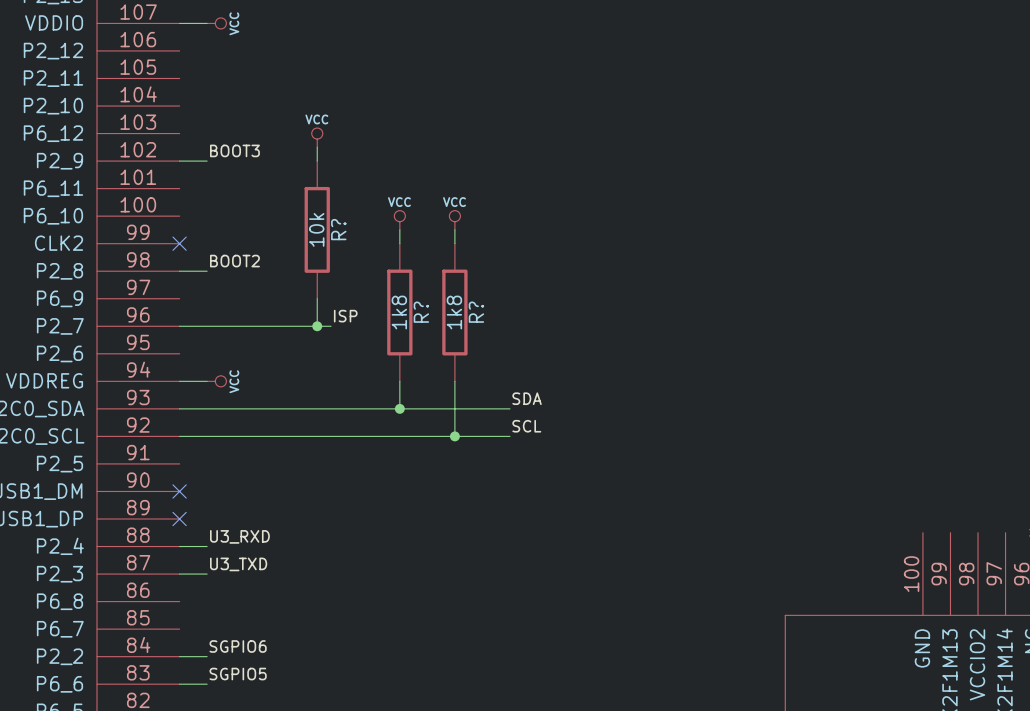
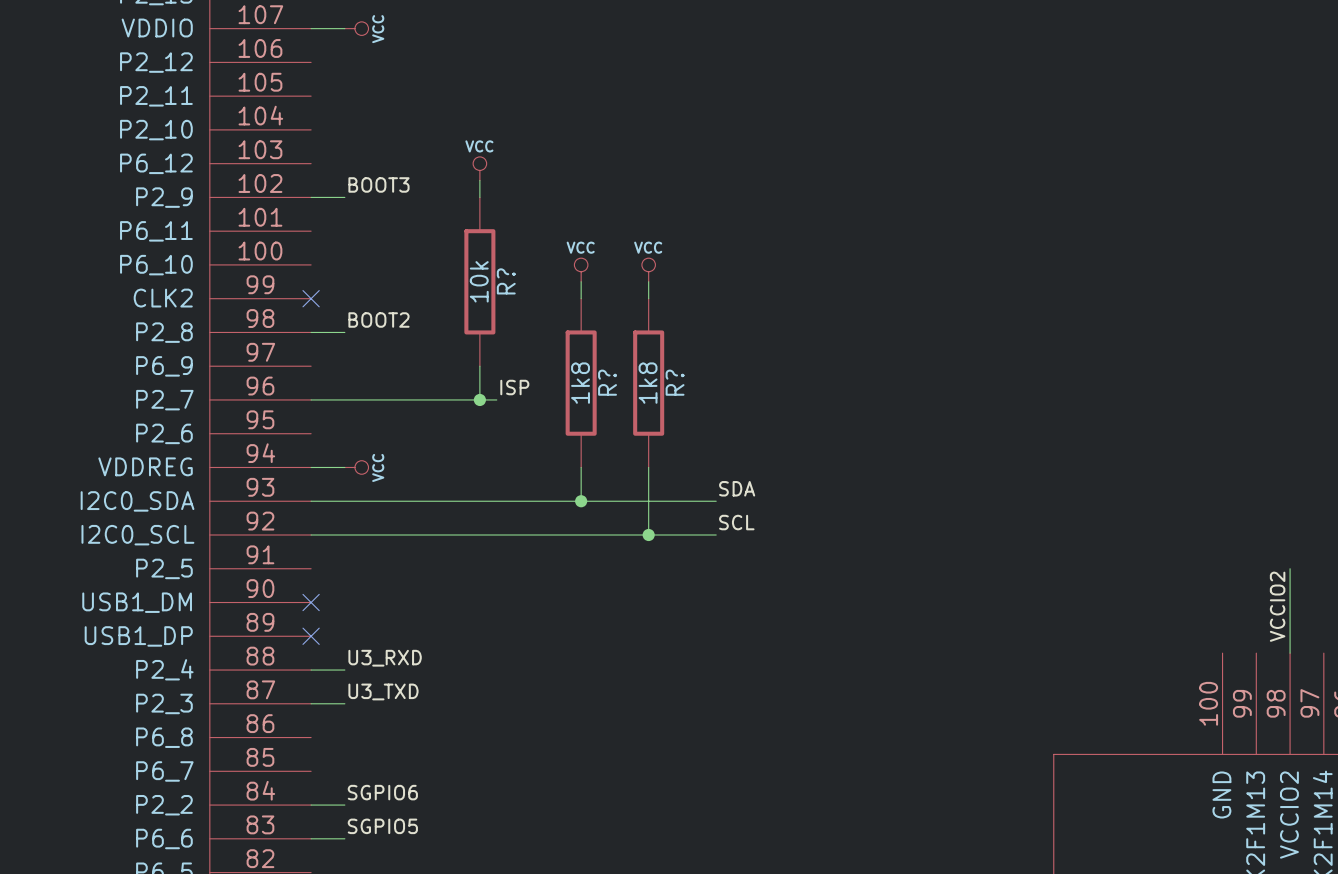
wire: none -> (1290, 568) (1290, 653)
label: none -> VCCIO2 (1277, 606)

